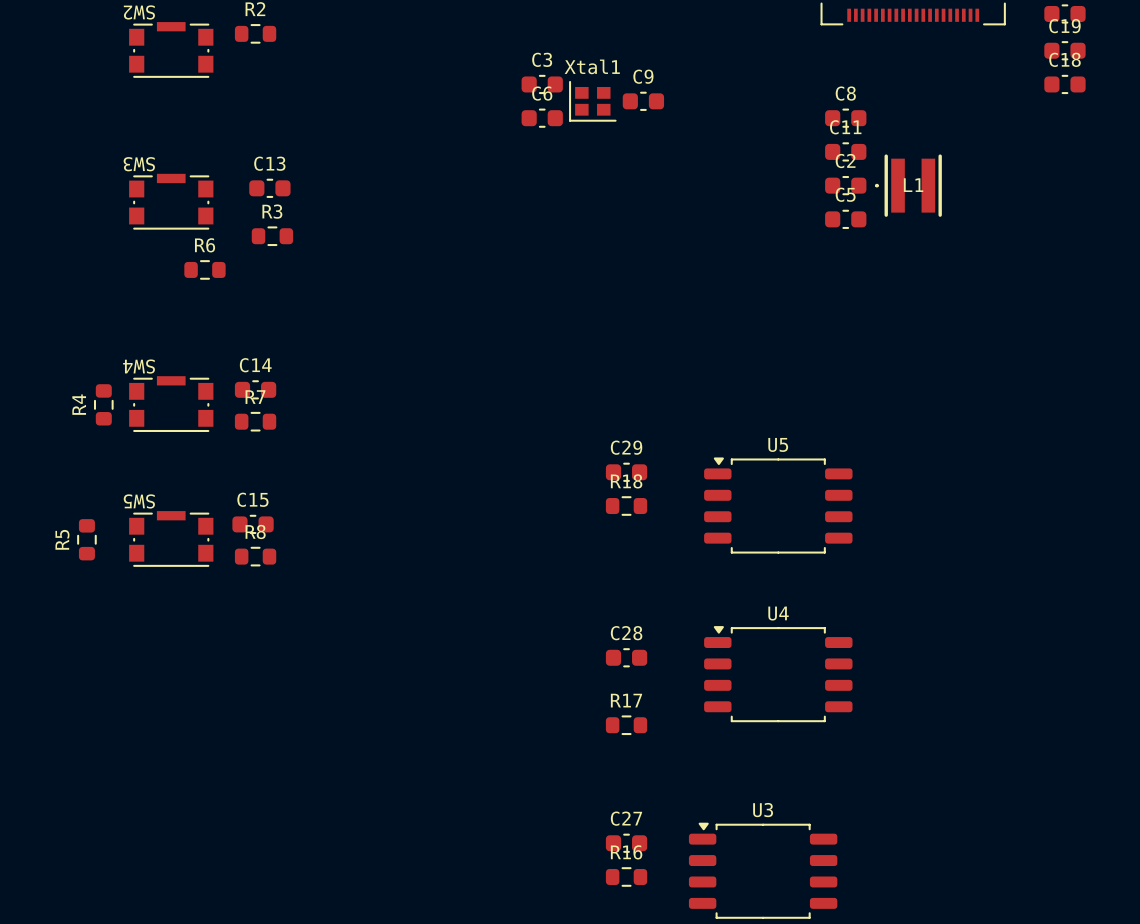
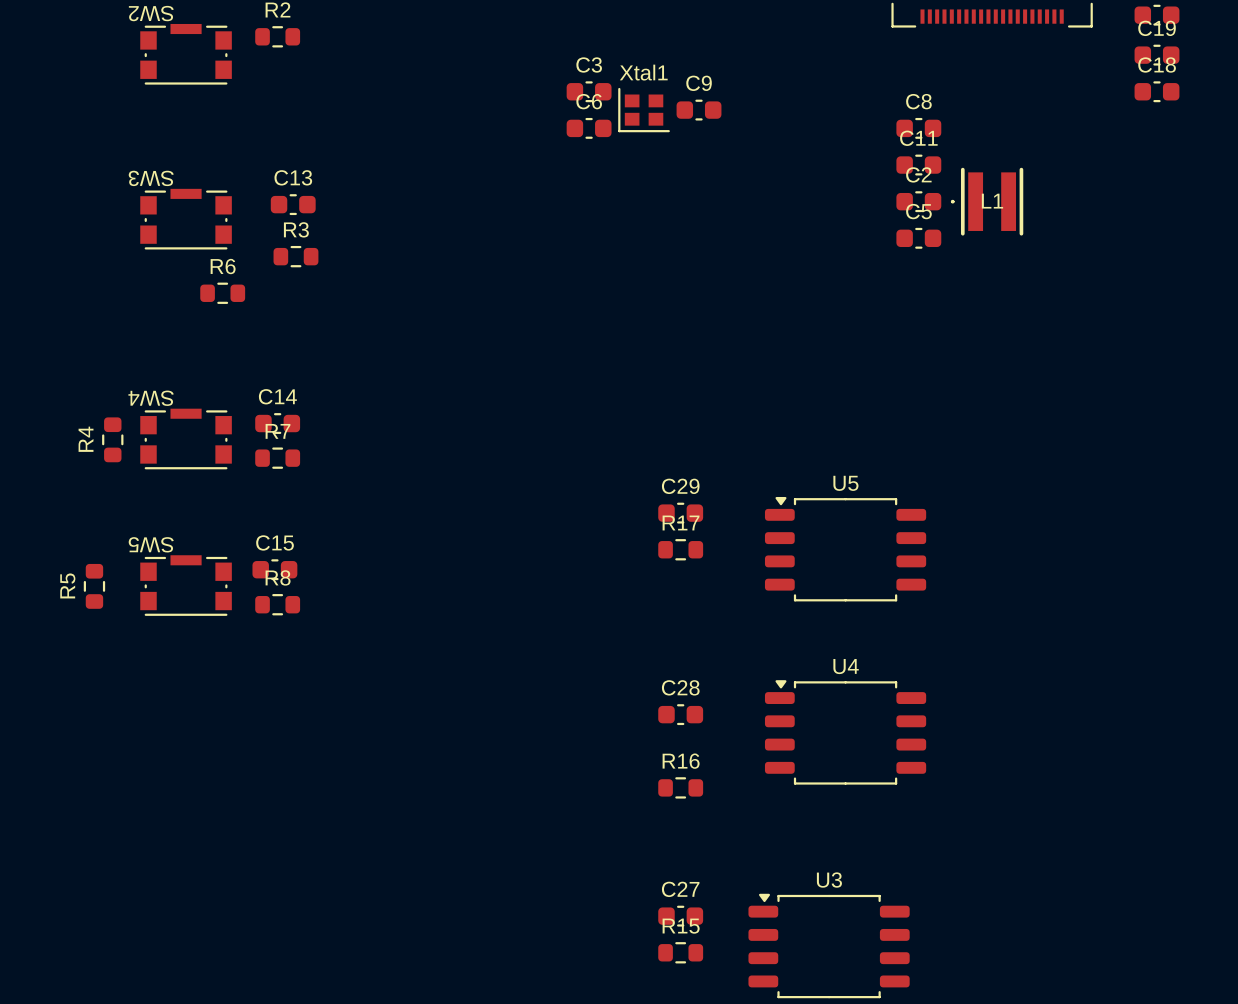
R18 name: R18 (626, 481) -> R17 (681, 522)
R17 name: R17 (626, 700) -> R16 (681, 761)
R16 name: R16 (626, 852) -> R15 (681, 926)

